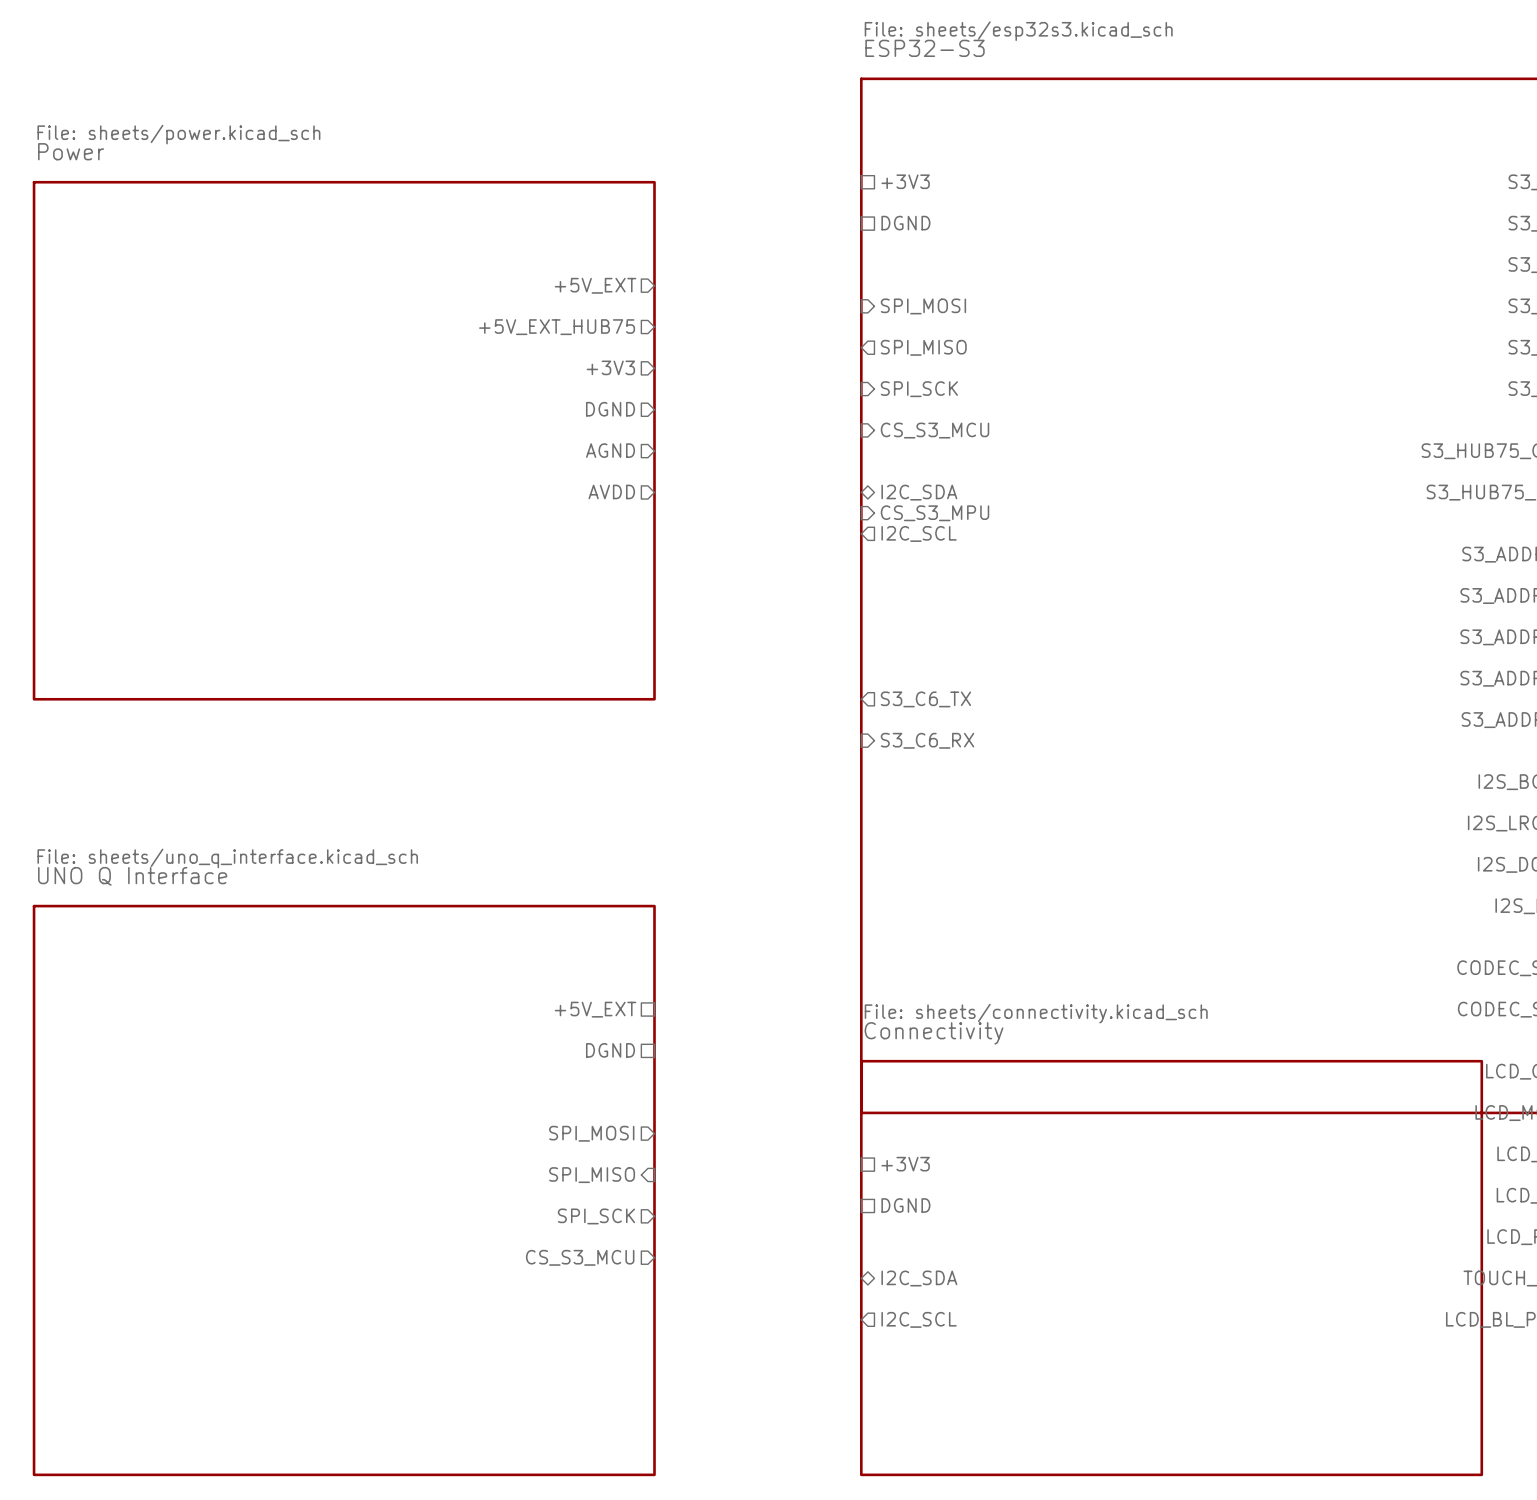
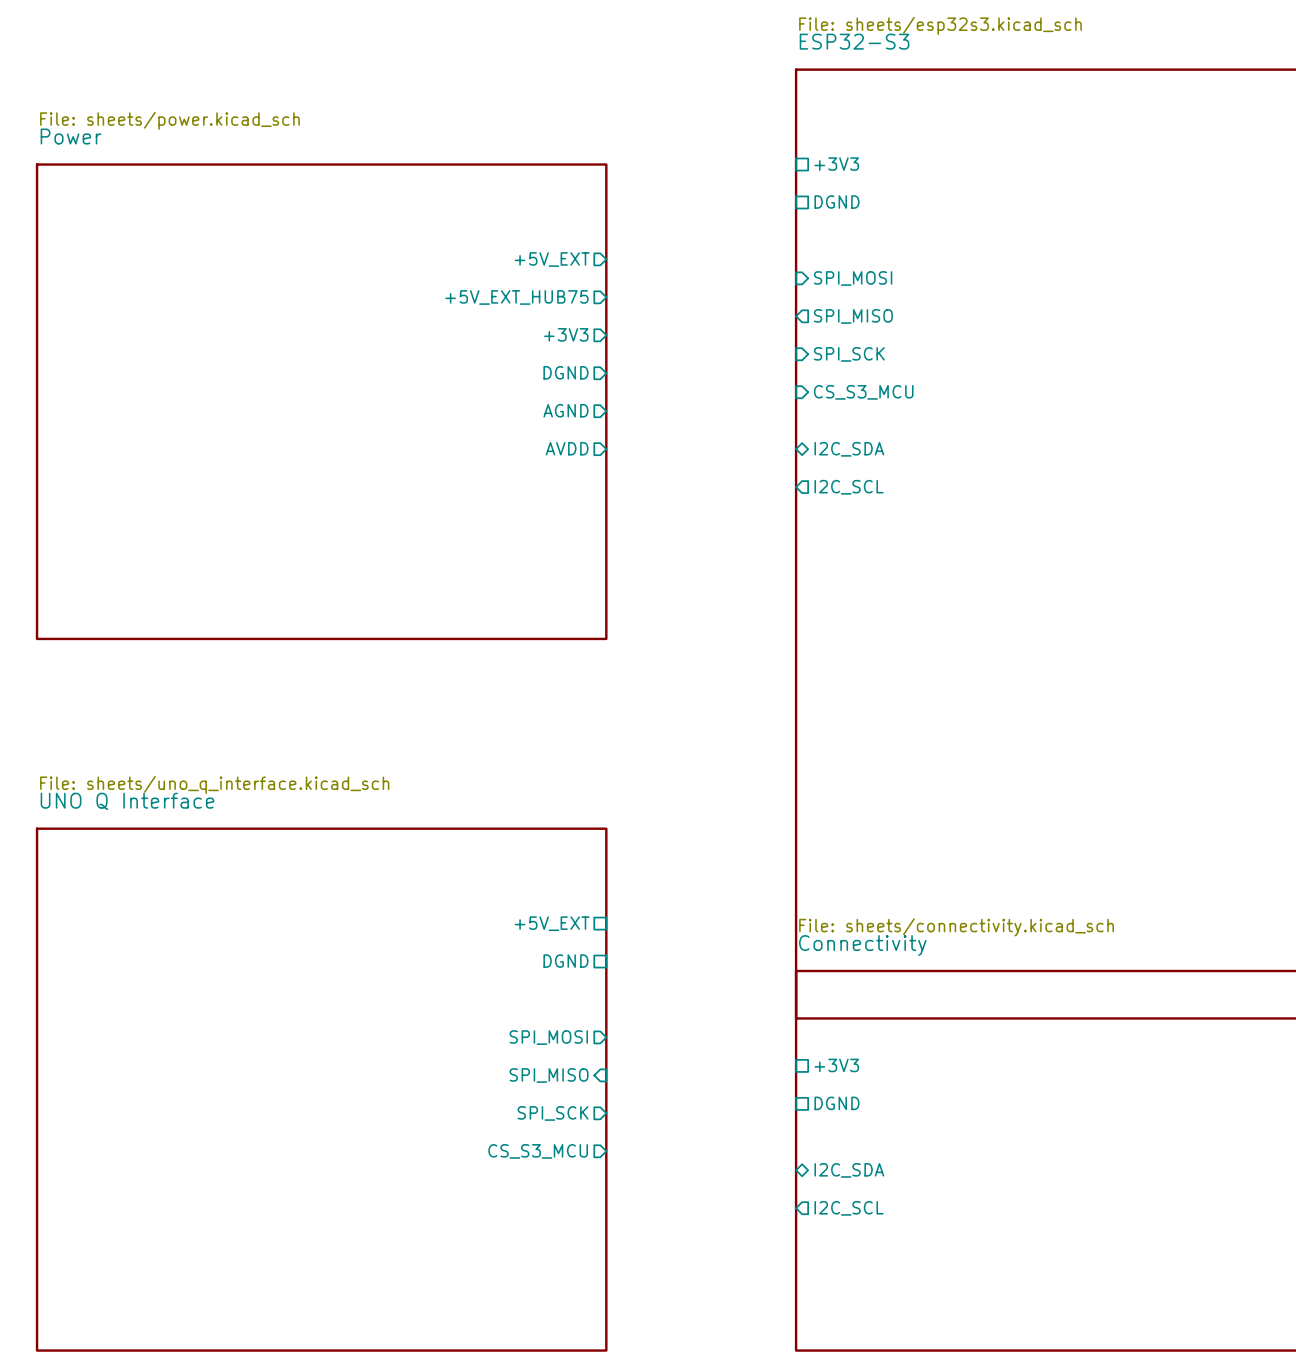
sheet pin: CS_S3_MPU (935, 513) -> none
sheet pin: S3_C6_TX (925, 699) -> none
sheet pin: S3_C6_RX (927, 740) -> none

